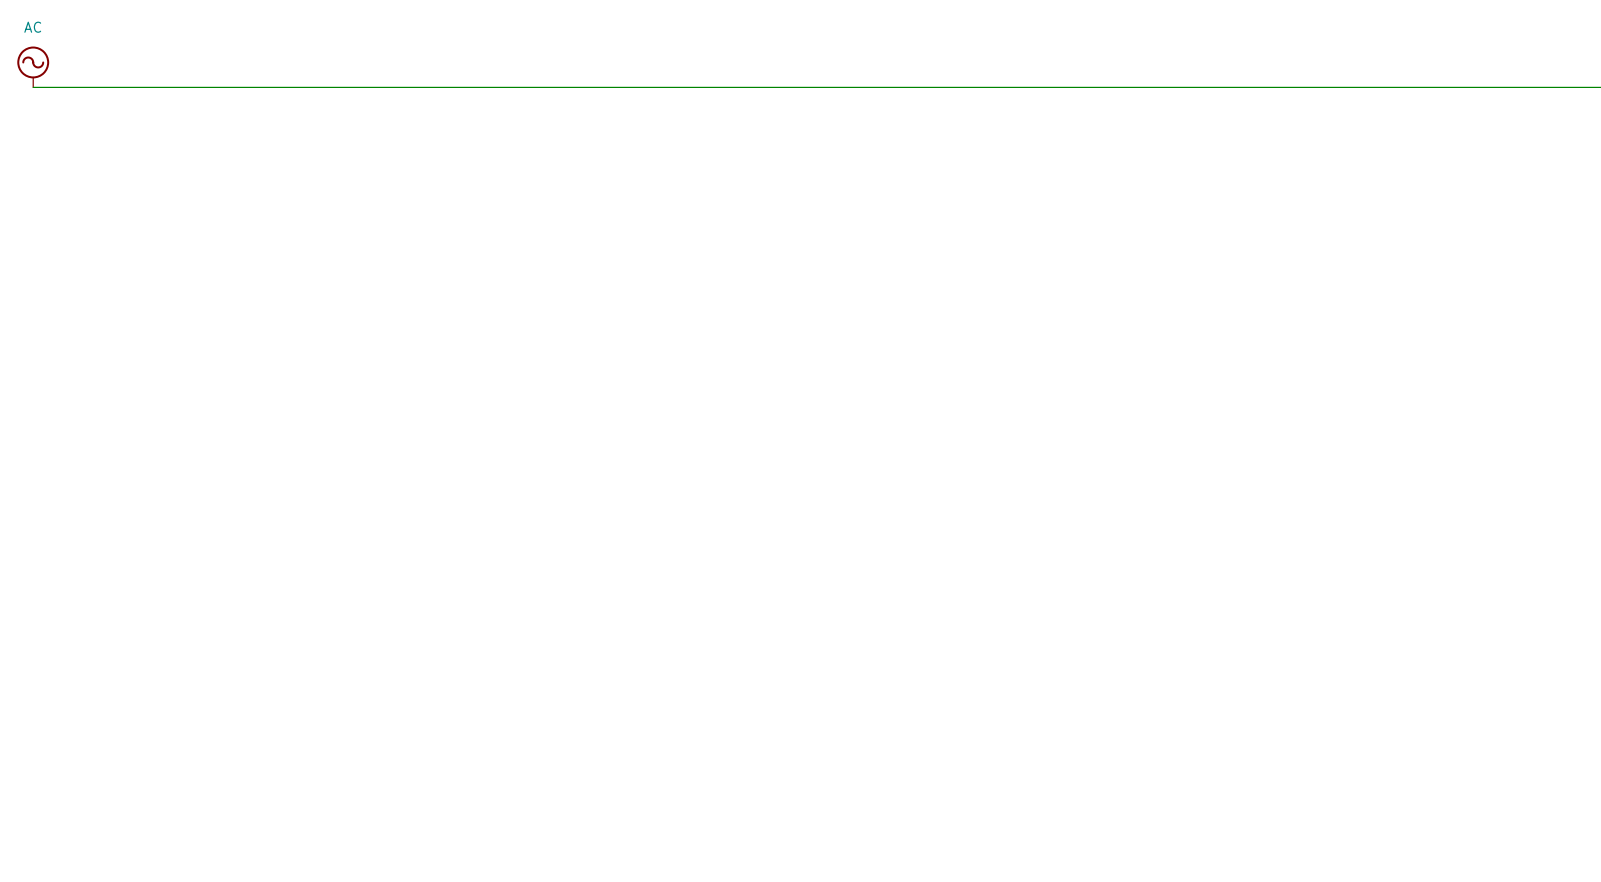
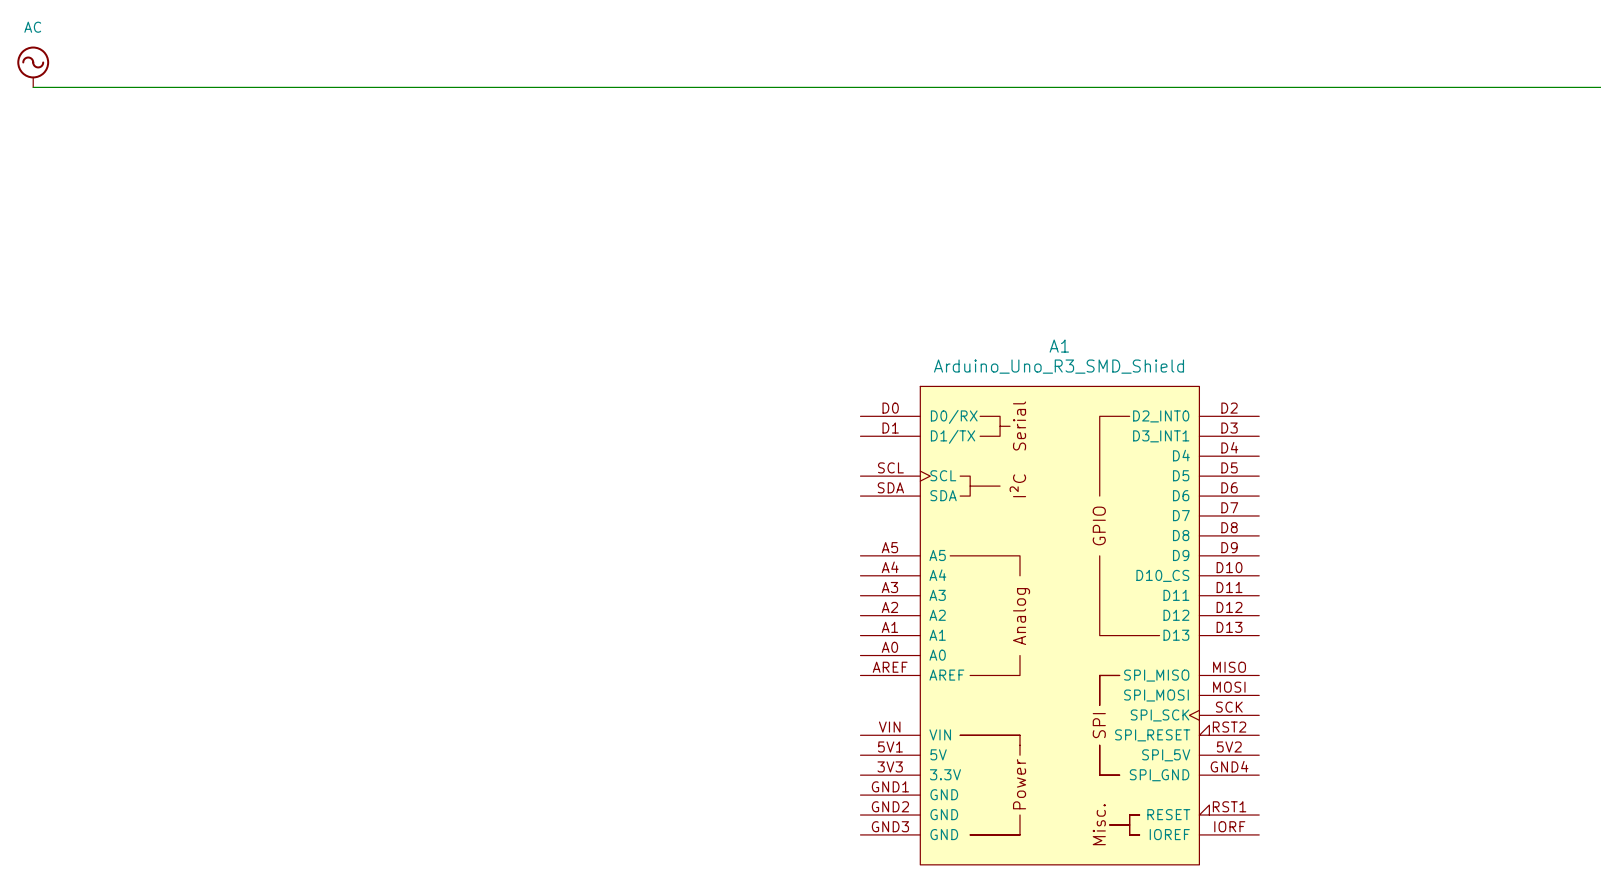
A1: none -> Arduino_Uno_R3_SMD_Shield (1059, 625)

